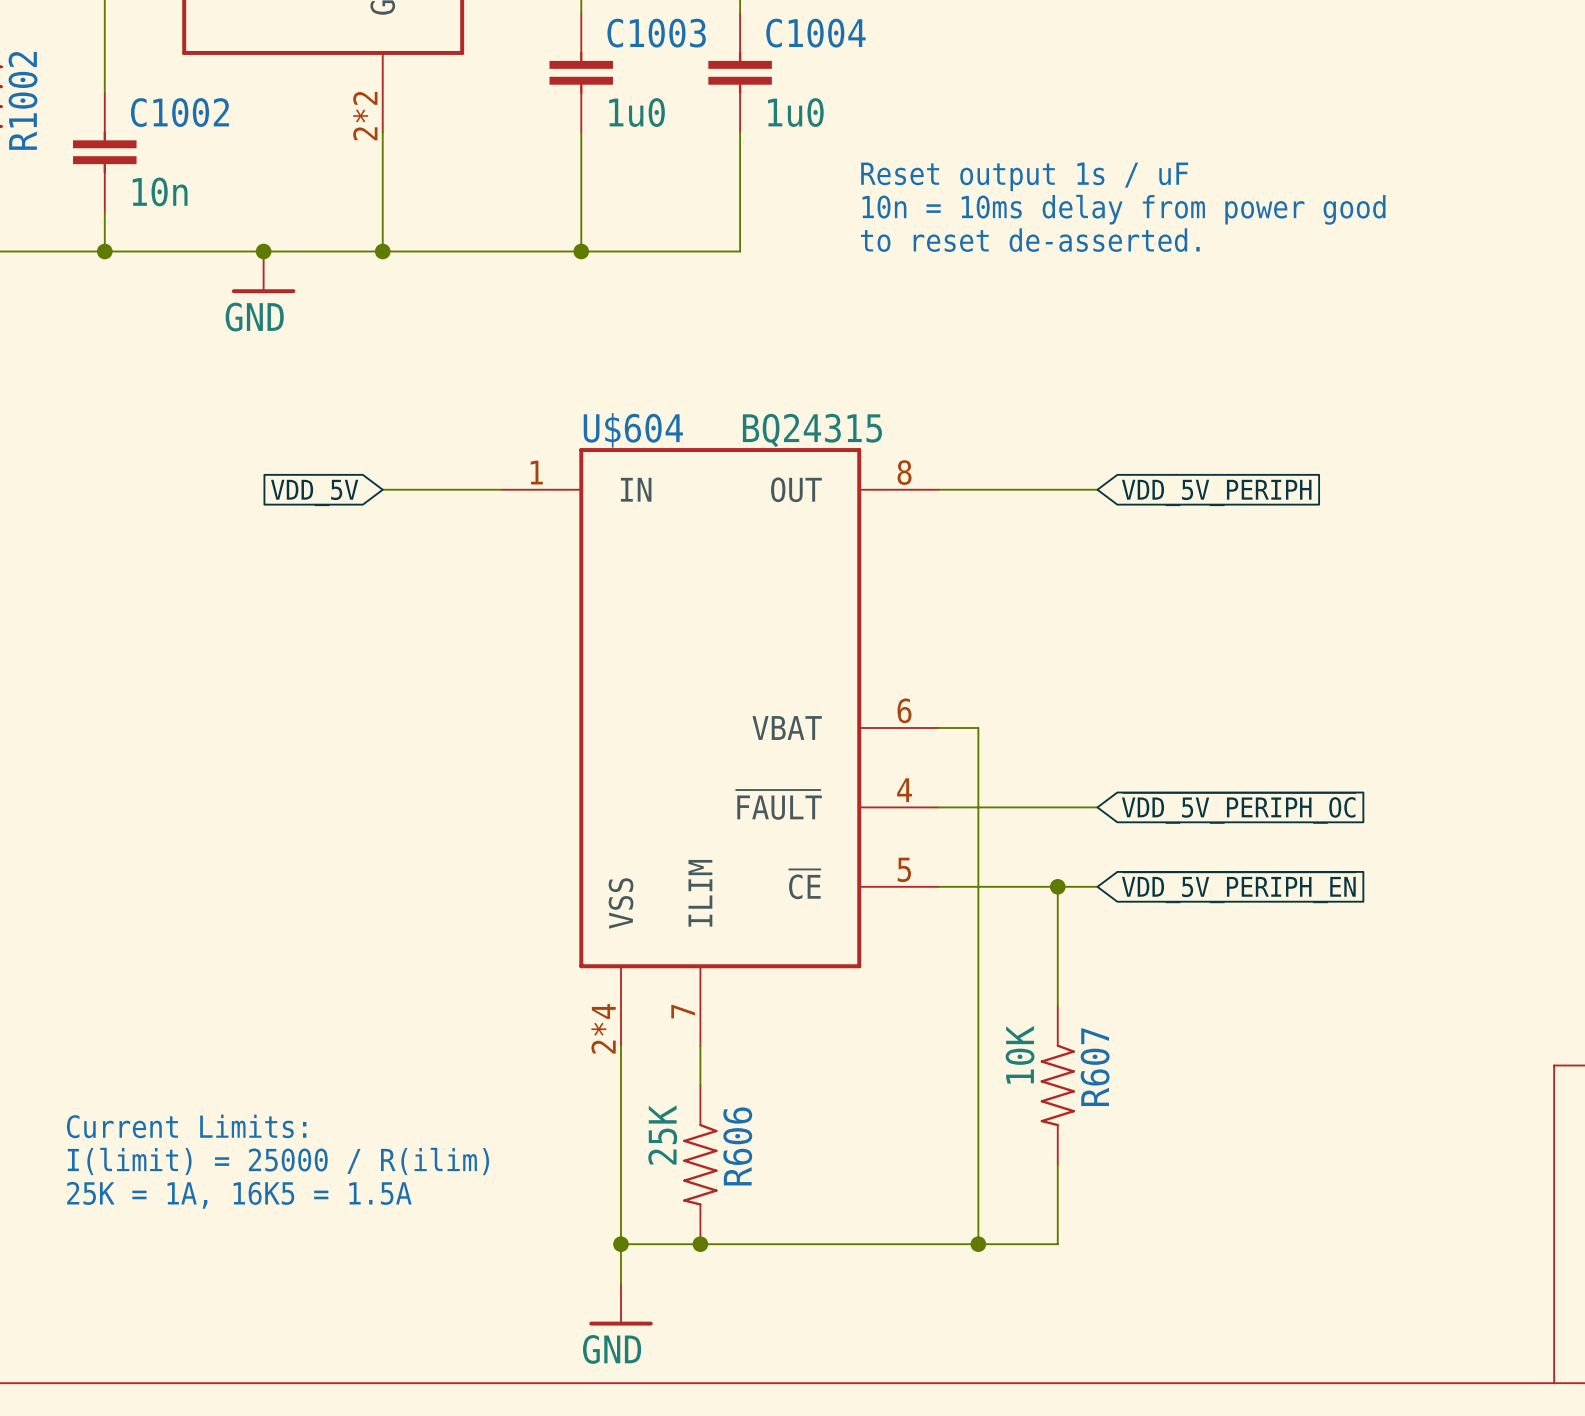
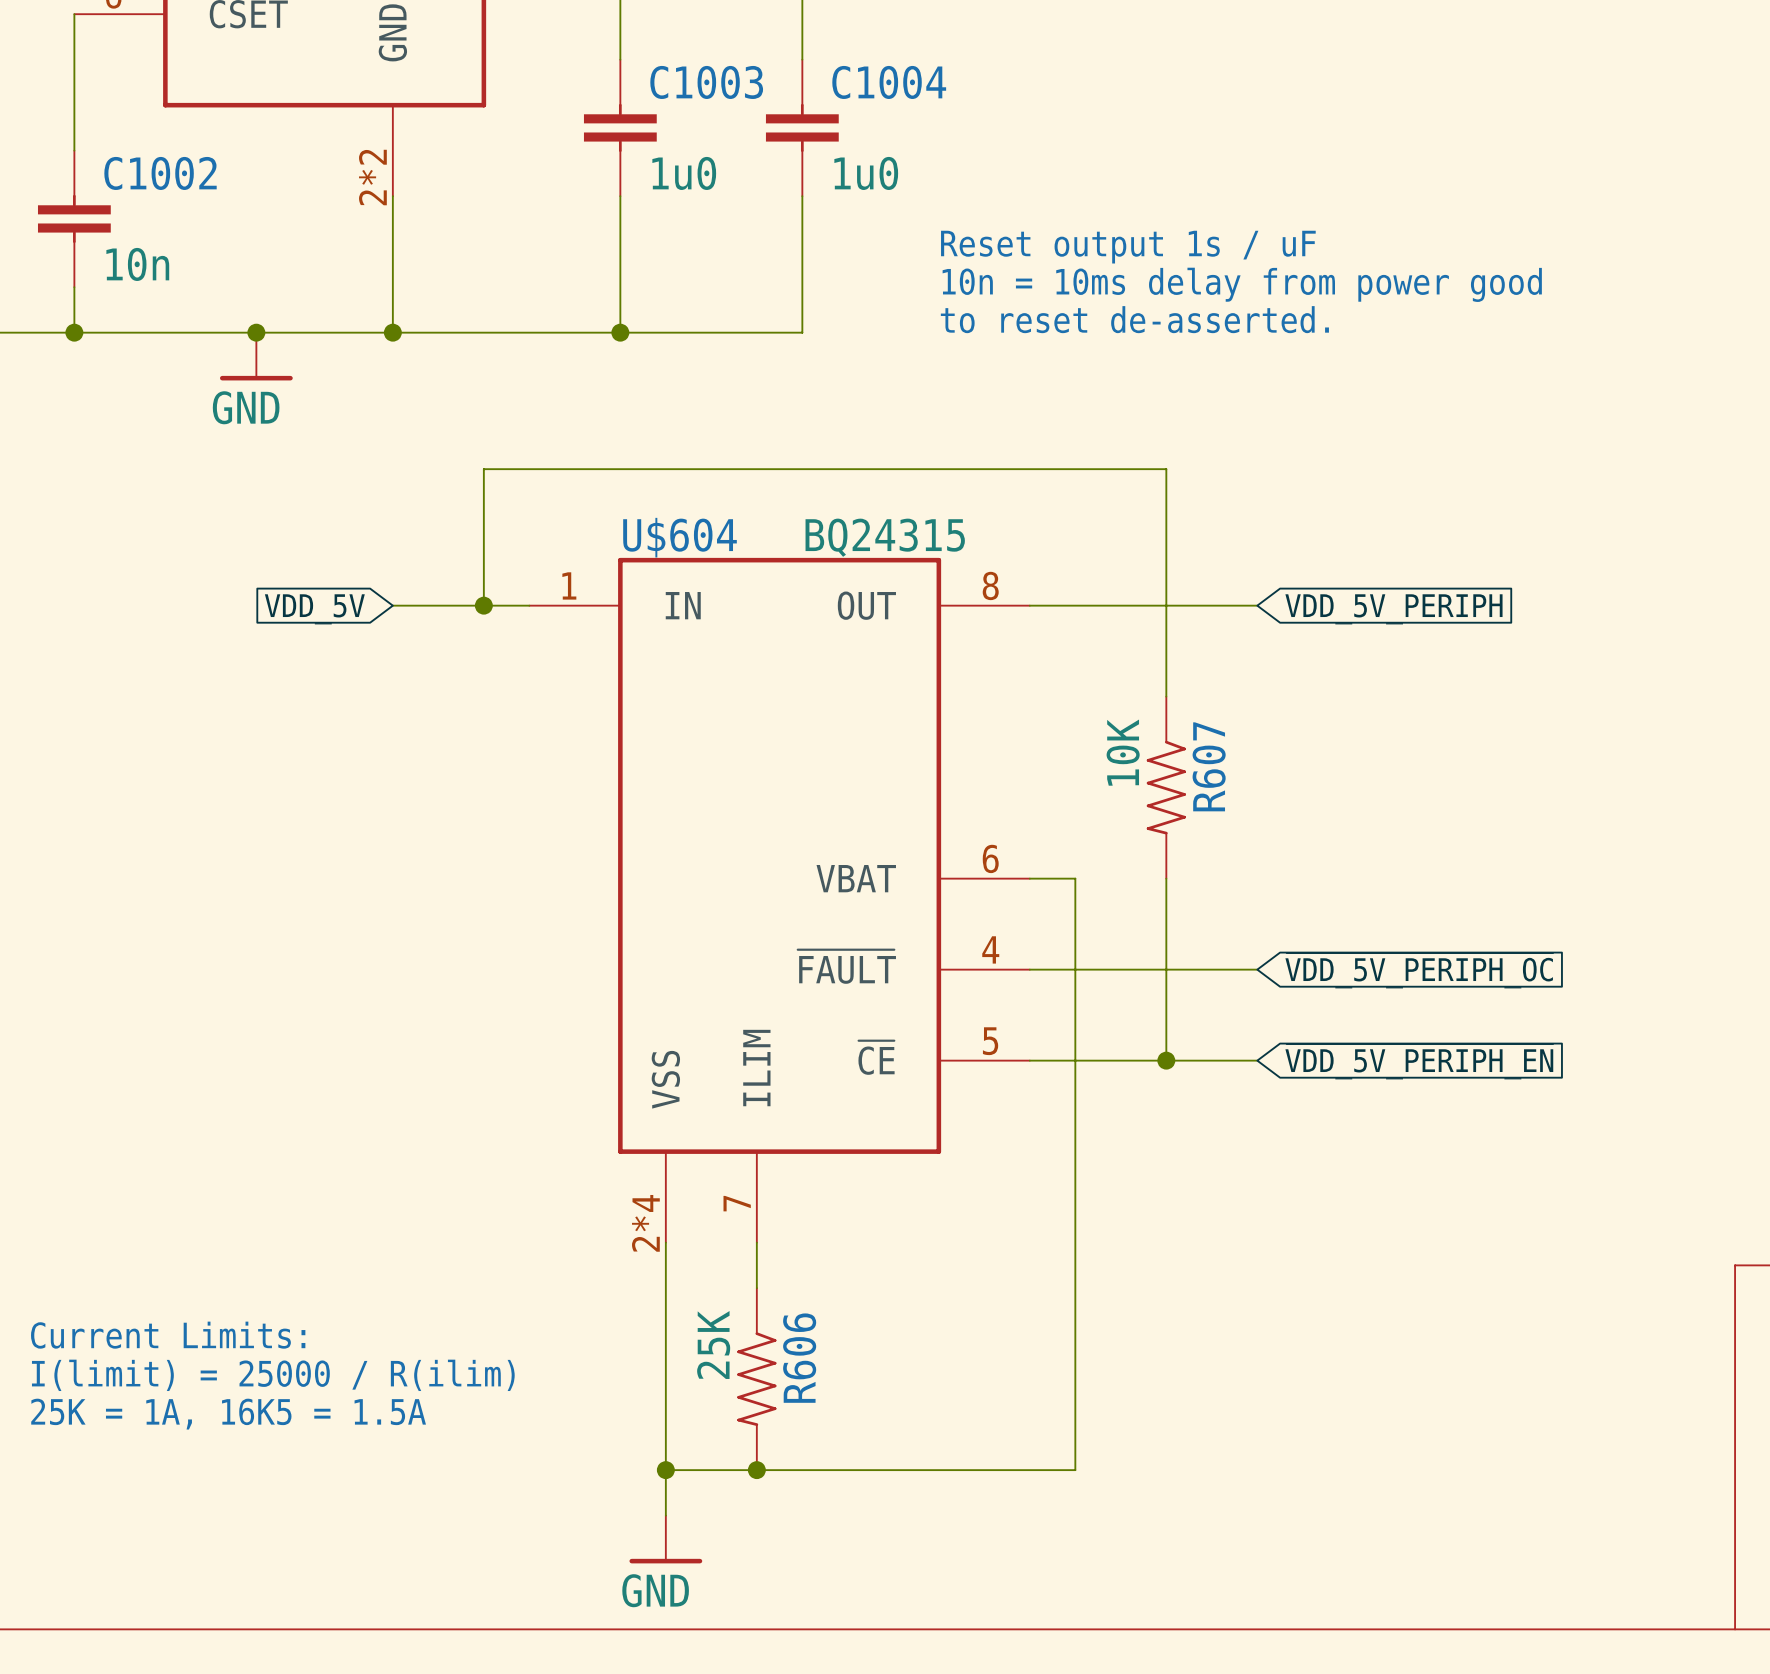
wire: none -> (483, 605) (483, 469) (1166, 469) (1166, 696)
junction: none -> (483, 605)
wire: none -> (1211, 605) (1257, 605)
global label position: VDD_5V_PERIPH (1216, 492) -> VDD_5V_PERIPH (1393, 609)
wire: none -> (1211, 969) (1257, 969)
global label position: ~{VDD_5V_PERIPH_OC} (1238, 808) -> ~{VDD_5V_PERIPH_OC} (1419, 970)
wire: (1057, 886) (1057, 1005) -> (1166, 1060) (1166, 878)
wire: none -> (1211, 1060) (1257, 1060)
global label position: ~{VDD_5V_PERIPH_EN} (1238, 887) -> ~{VDD_5V_PERIPH_EN} (1419, 1061)
R607 position: (1057, 1085) -> (1166, 787)
wire: (1057, 1164) (1057, 1244) (978, 1244) -> none
junction: (978, 1244) -> none

